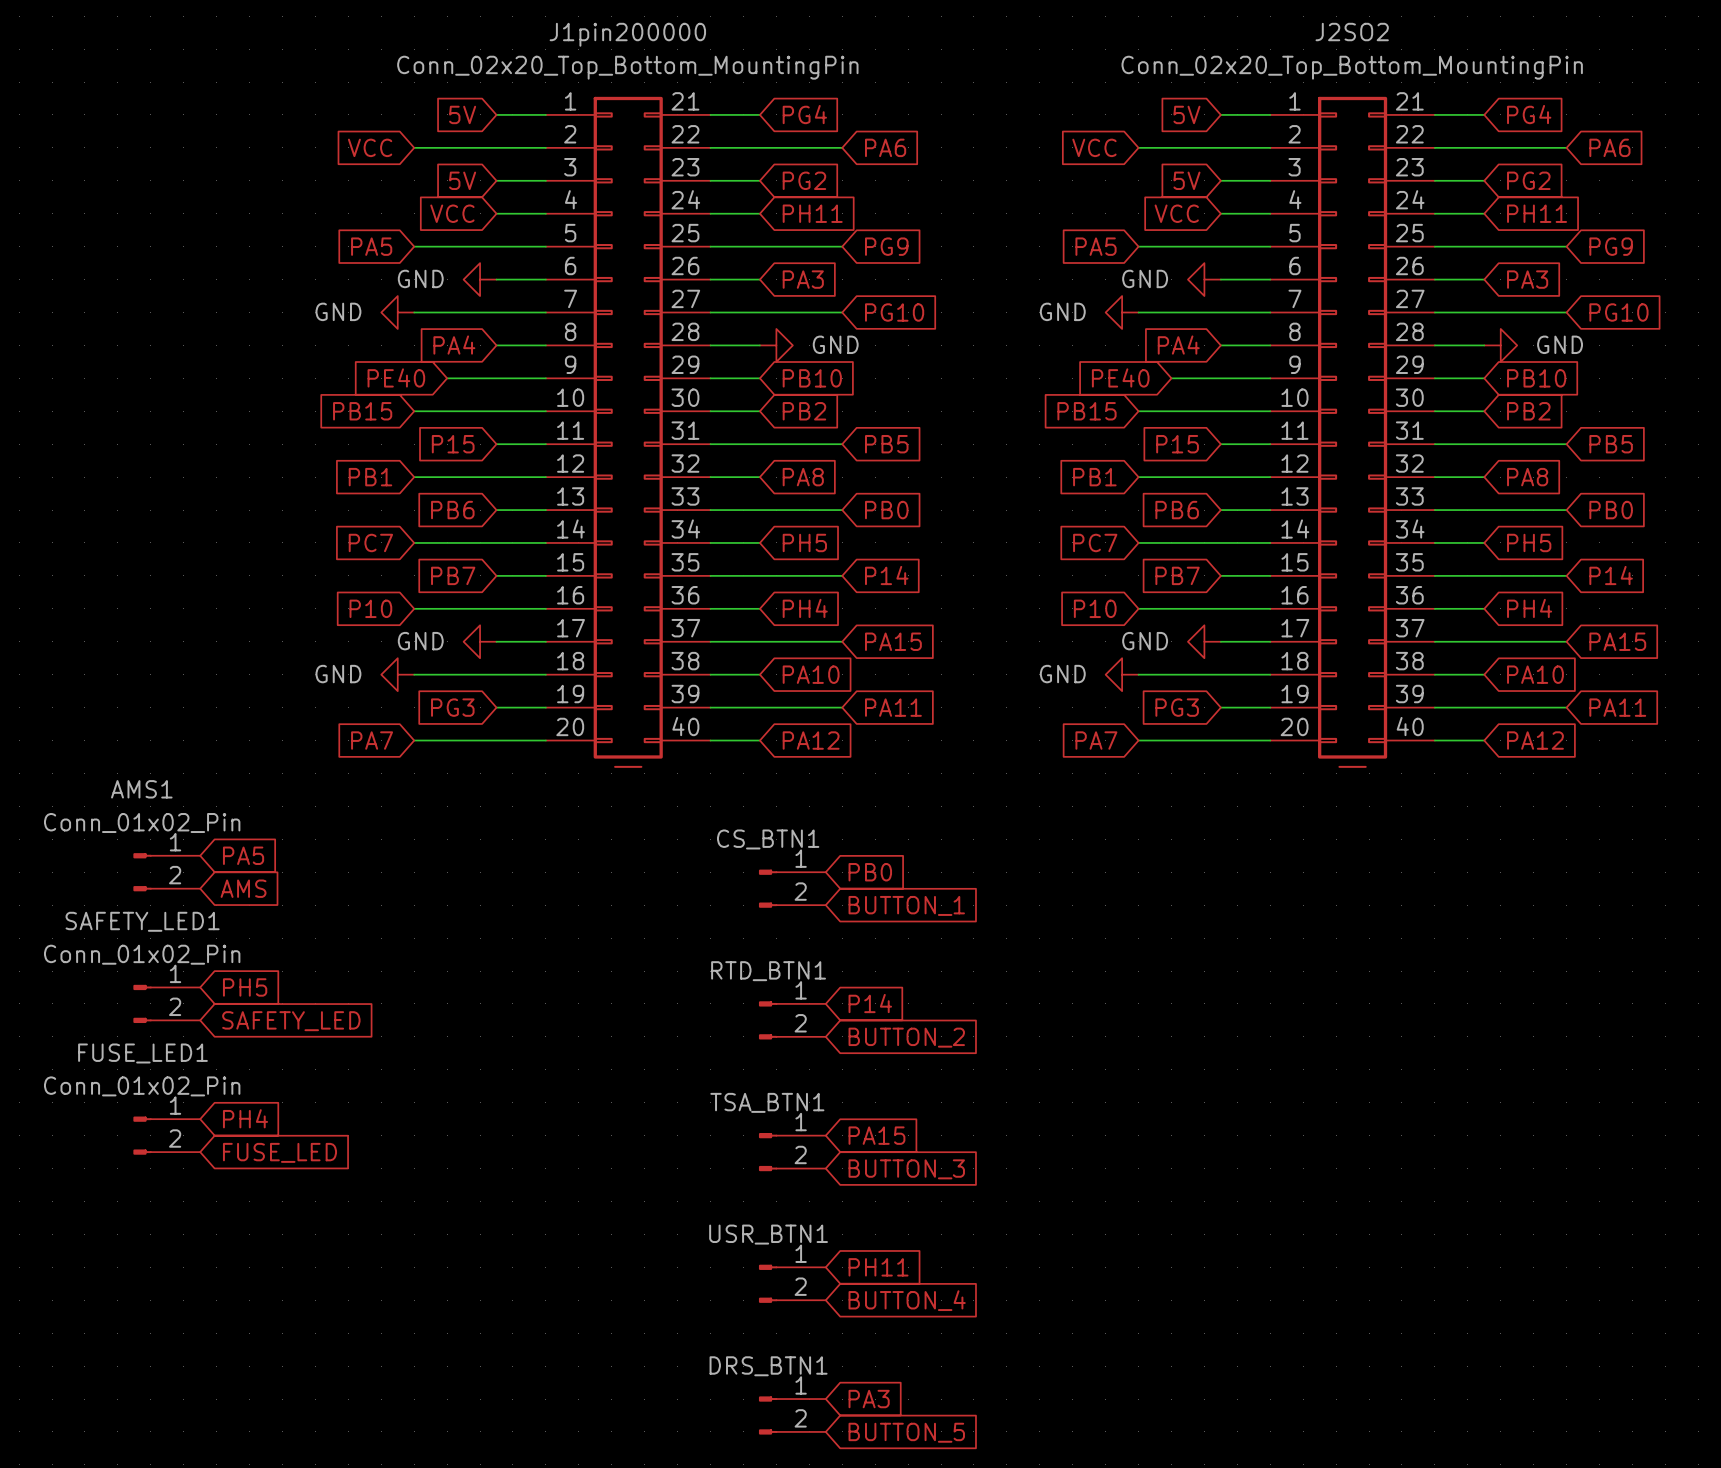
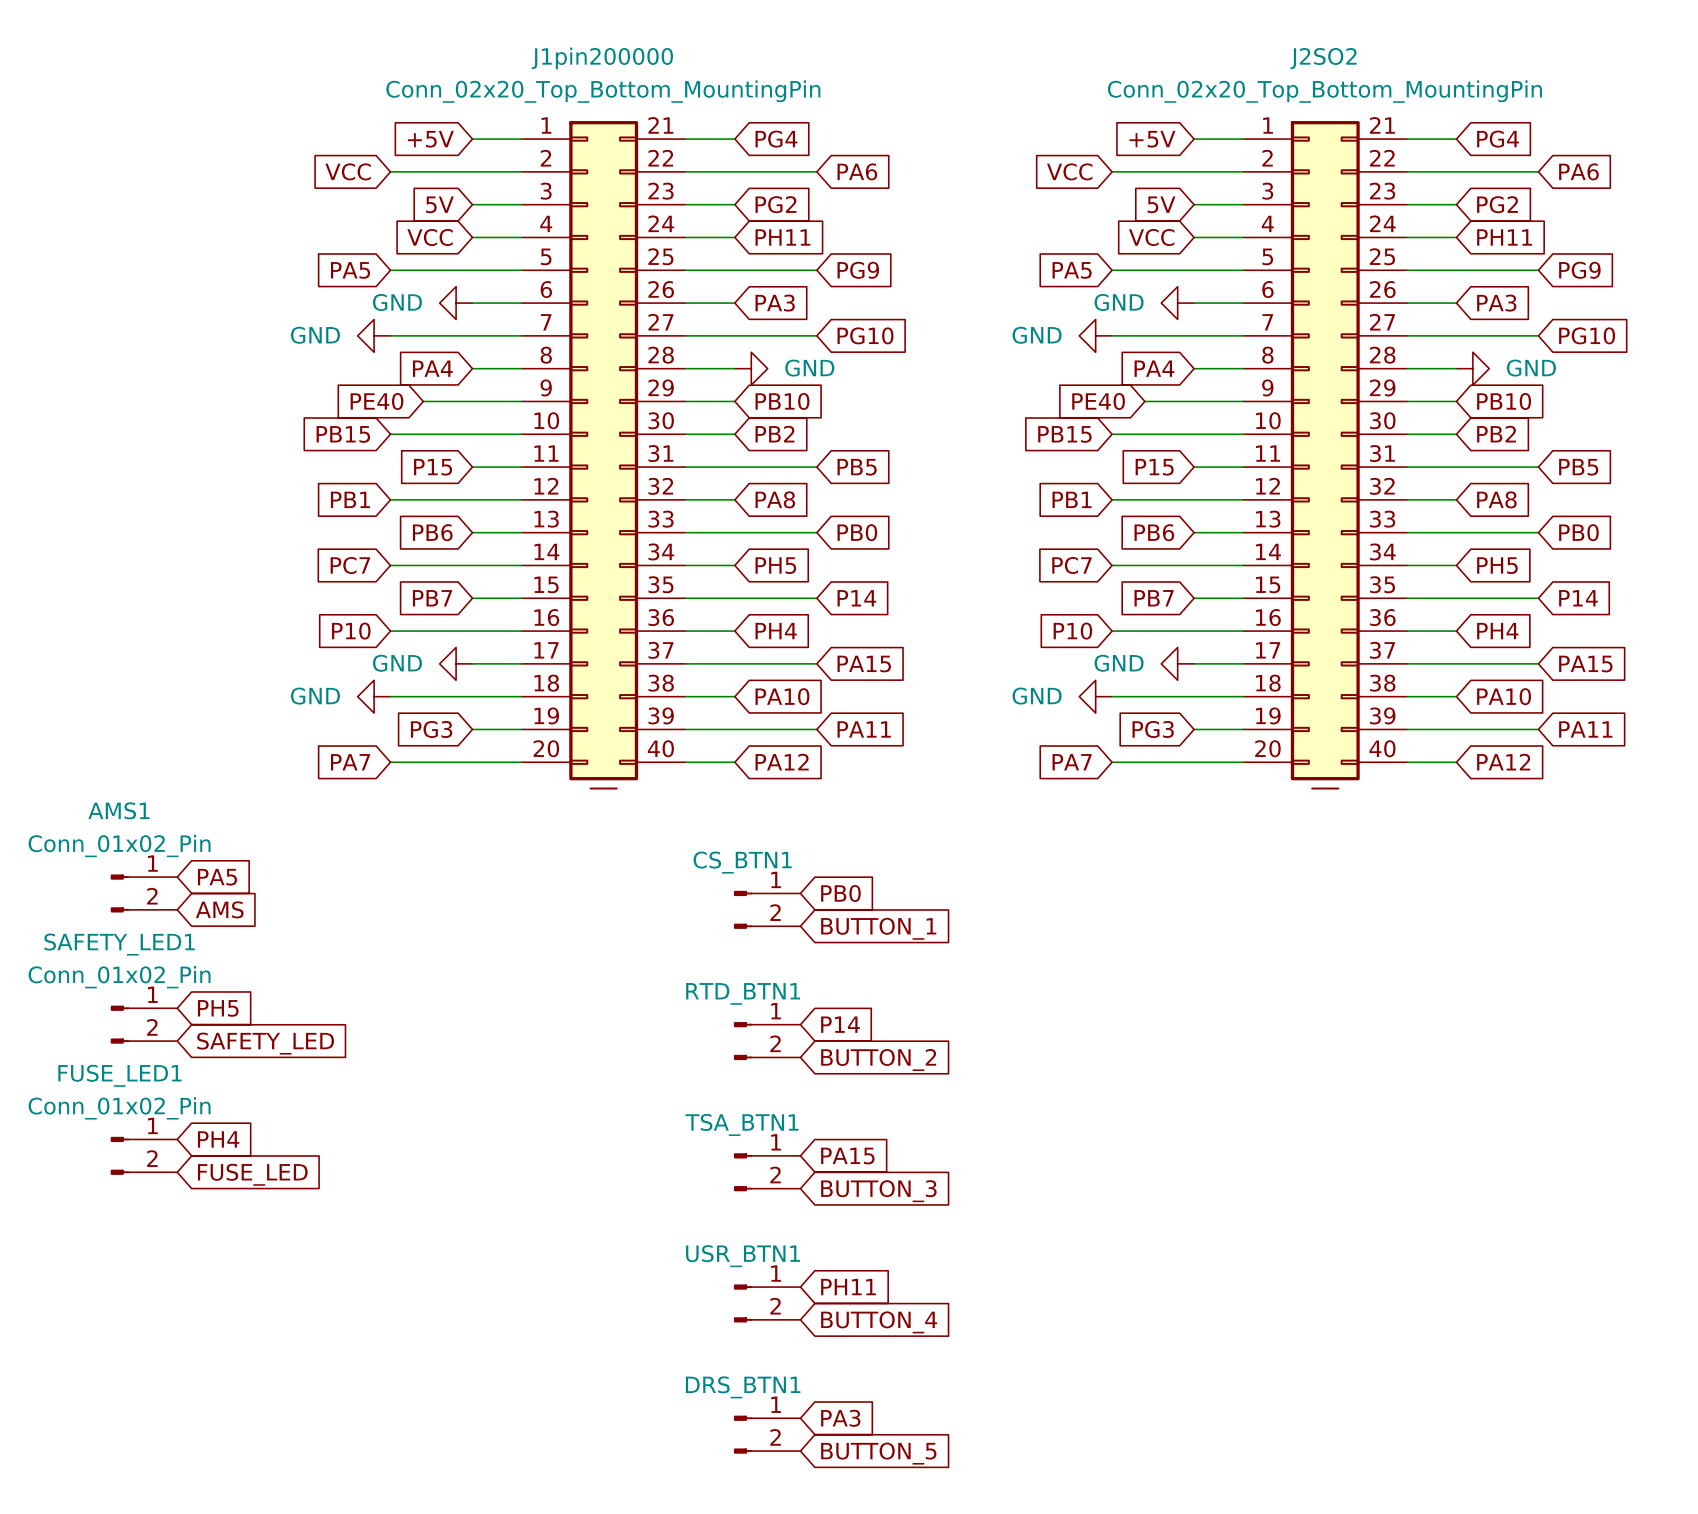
global label: 5V (462, 114) -> +5V (430, 139)
global label: 5V (1186, 114) -> +5V (1152, 139)

